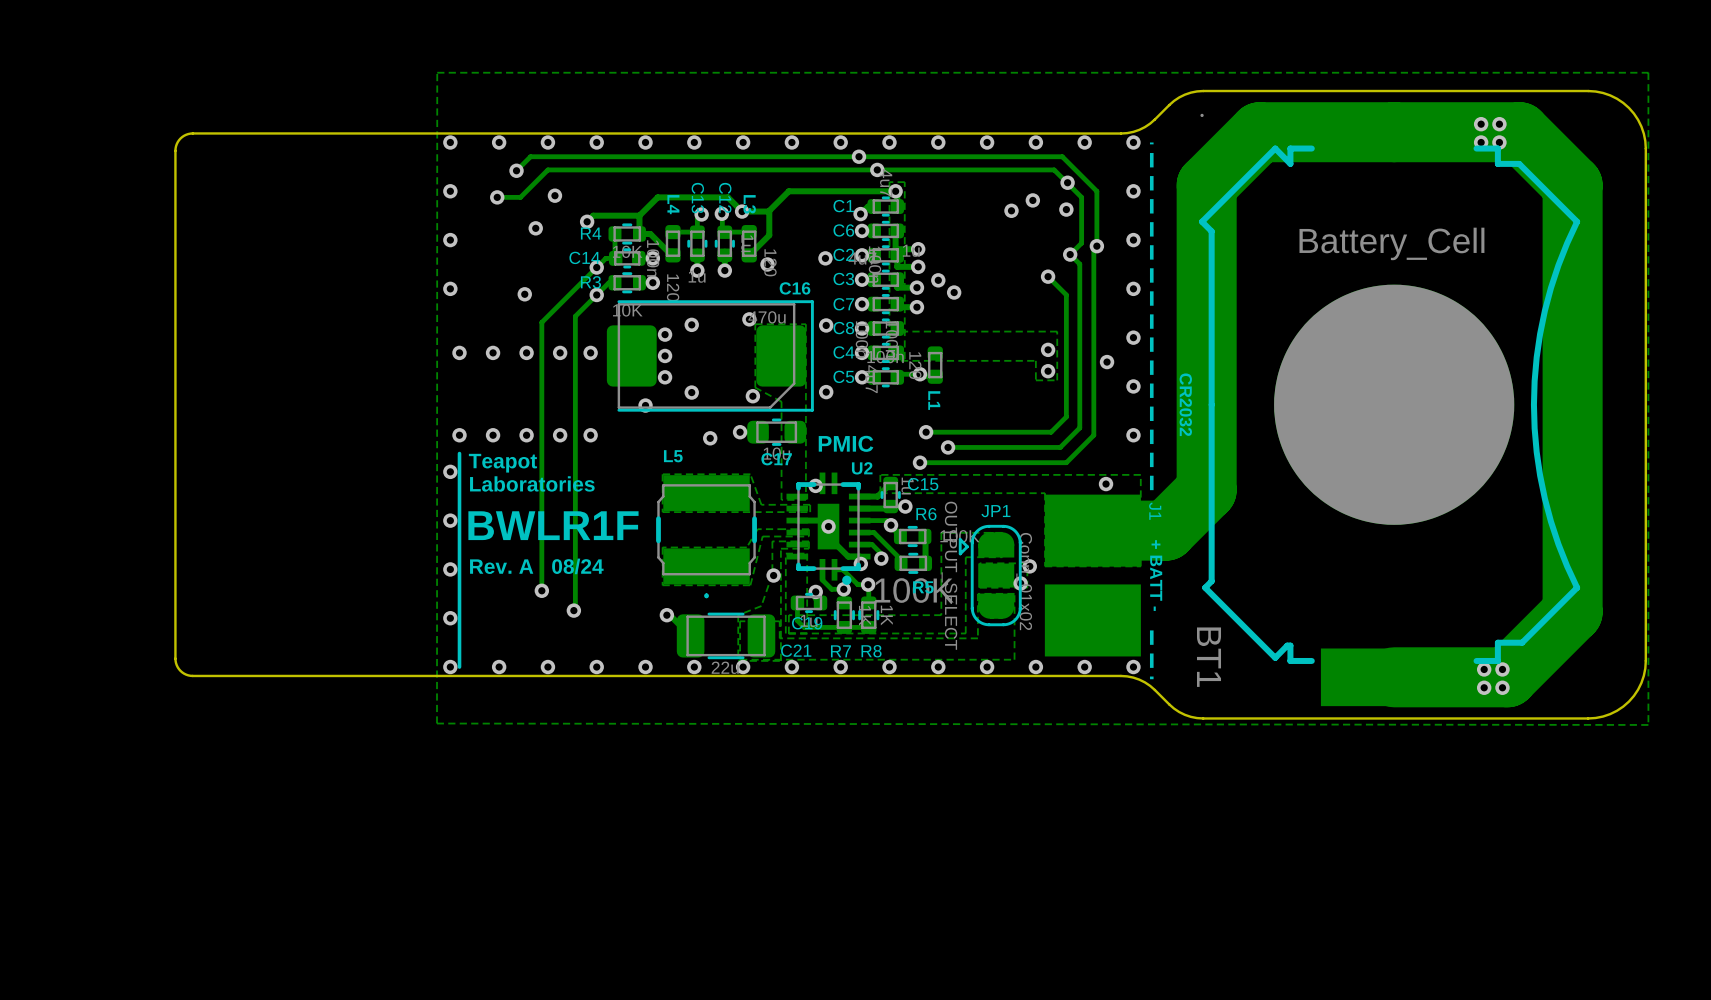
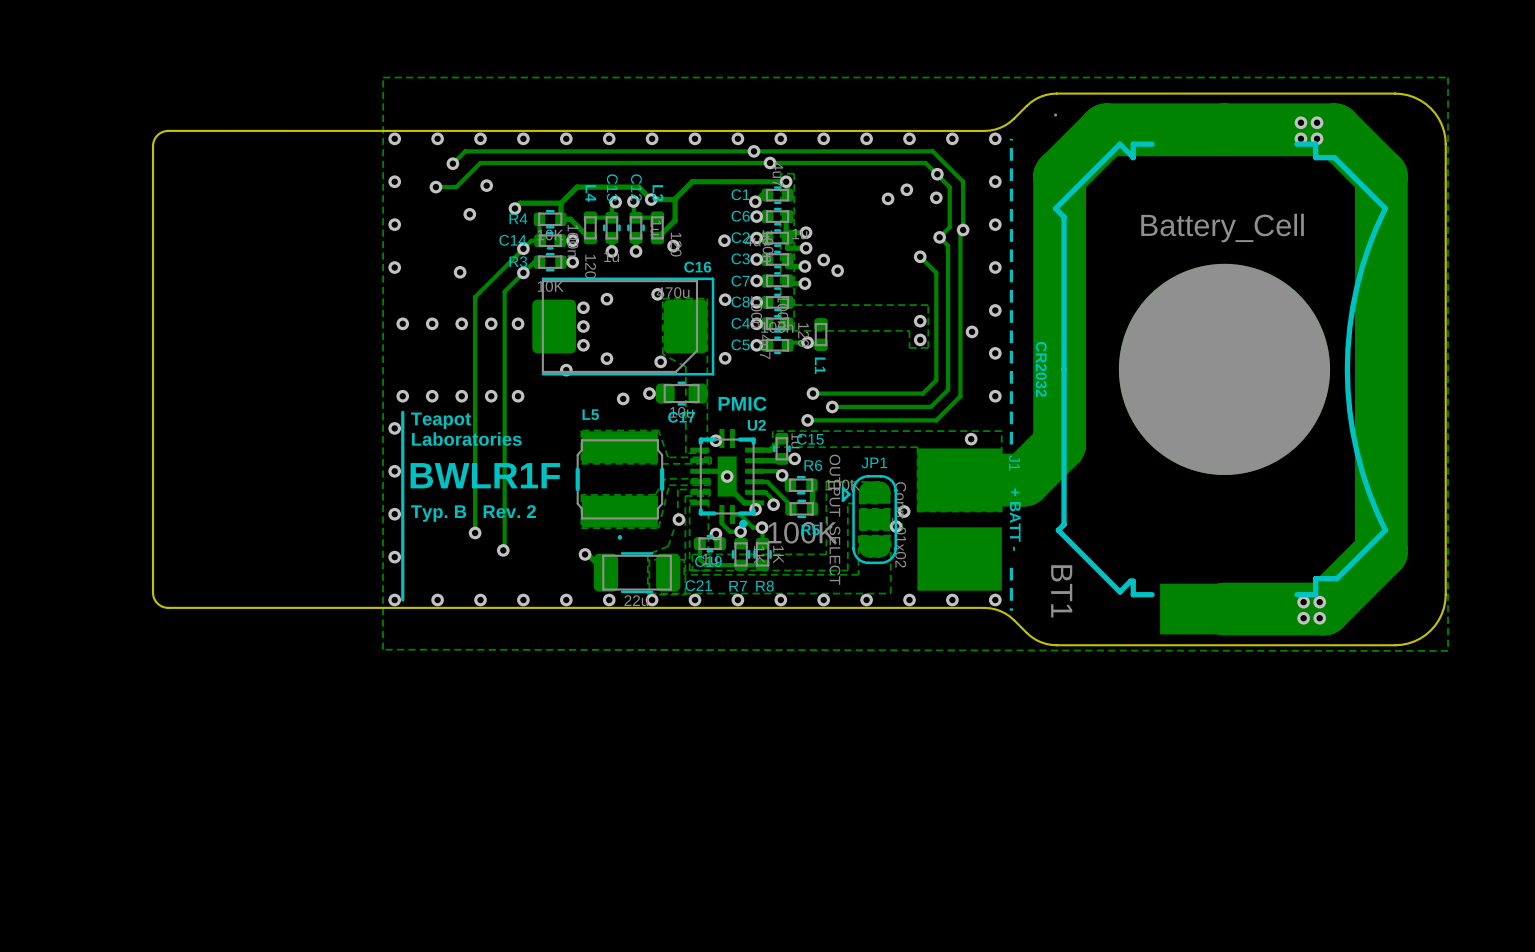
text: Rev. A 08/24 (536, 566) -> Typ. B Rev. 2 (473, 513)

